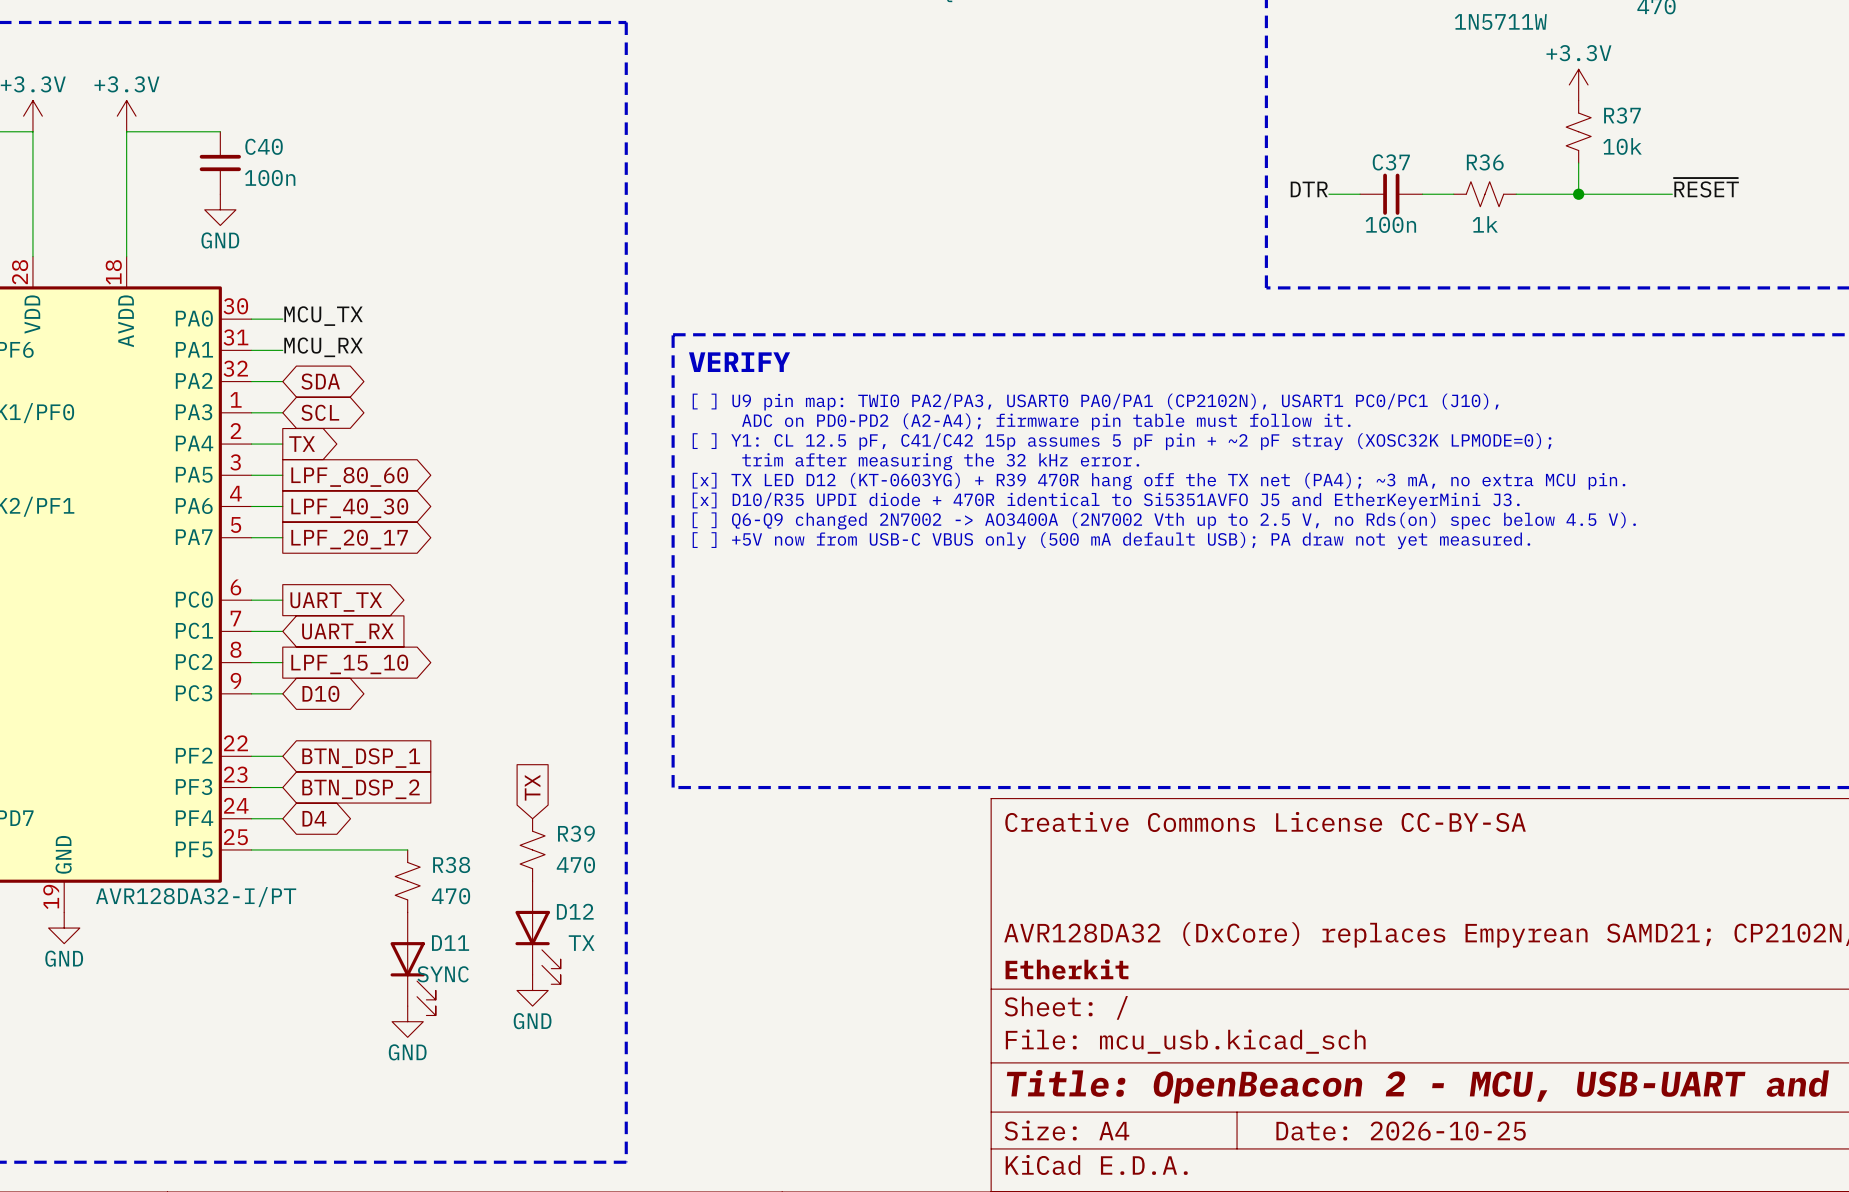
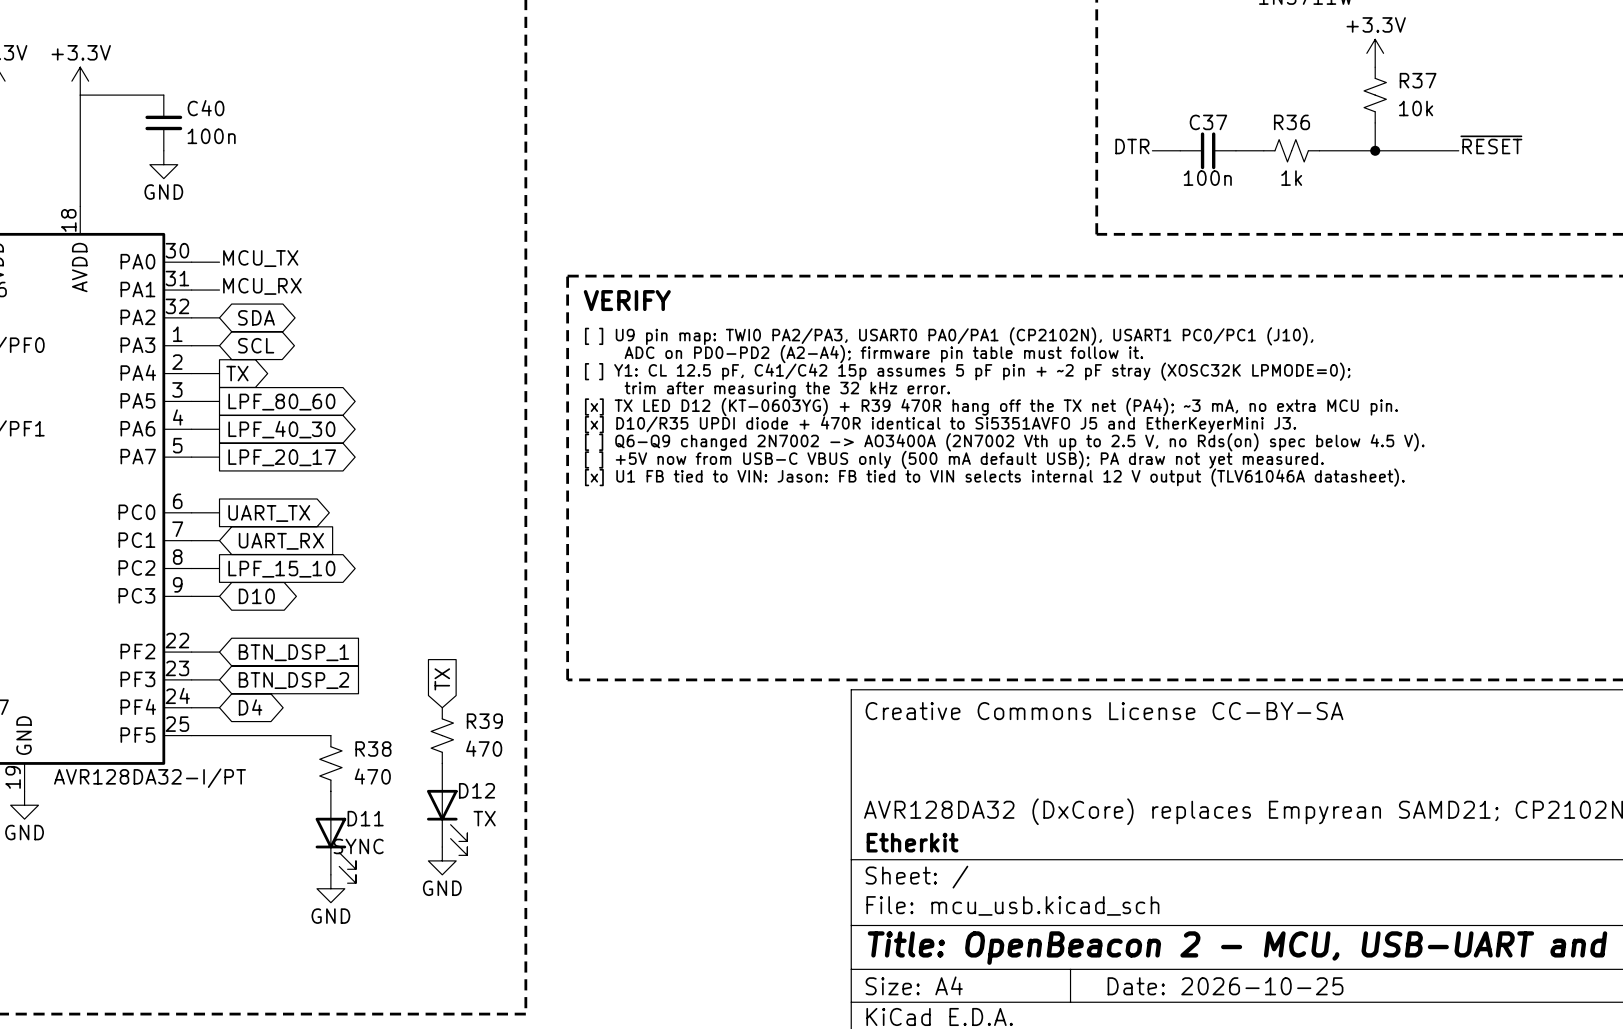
text: none -> [x] U1 FB tied to VIN: Jason: FB tied to VIN selects internal 12 V output (TLV61046A datasheet). (994, 477)

